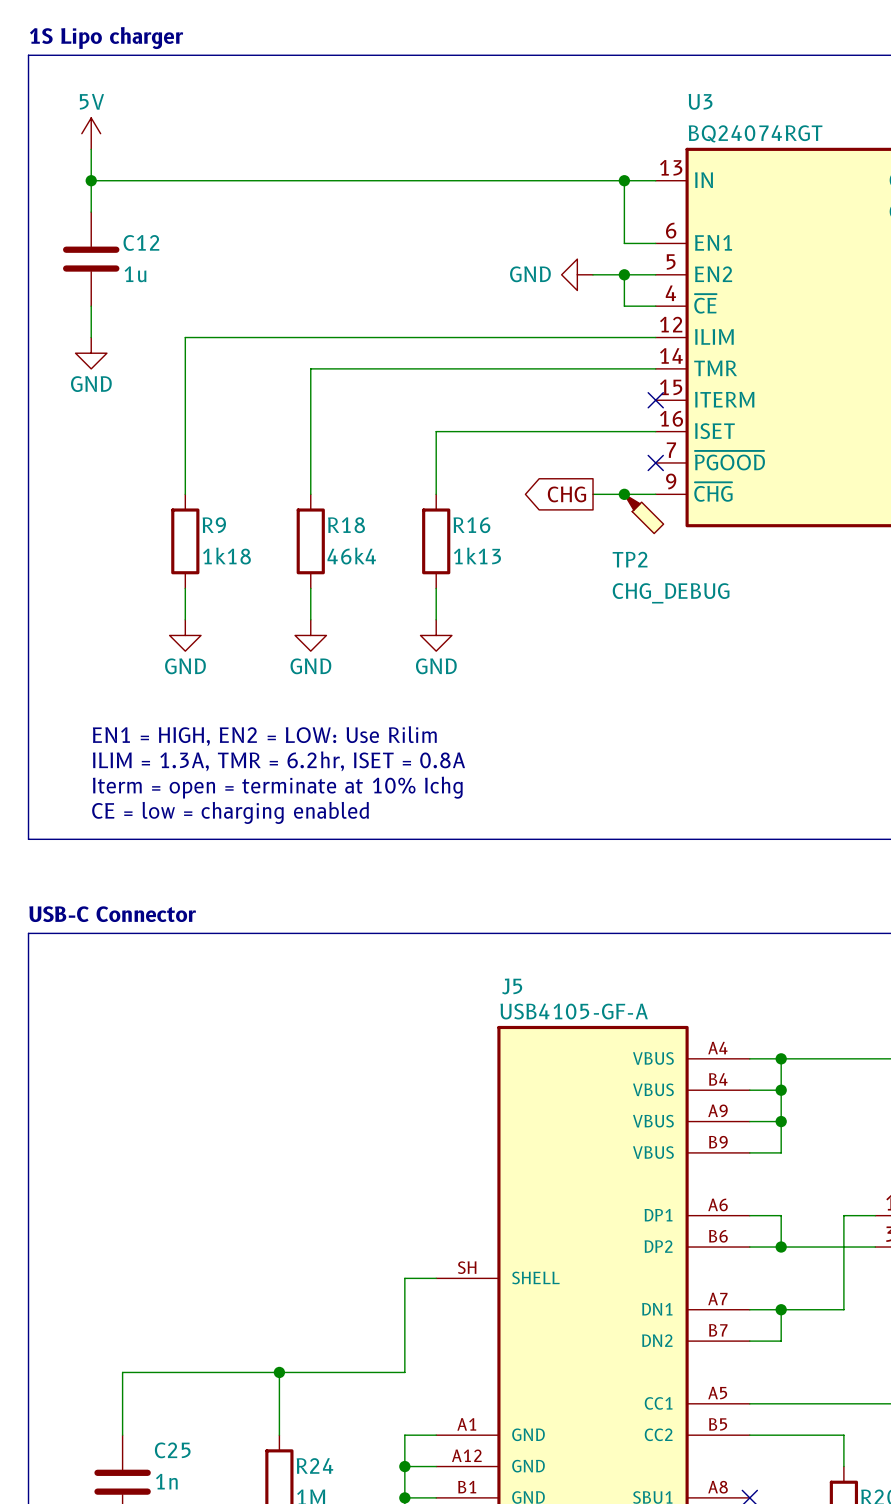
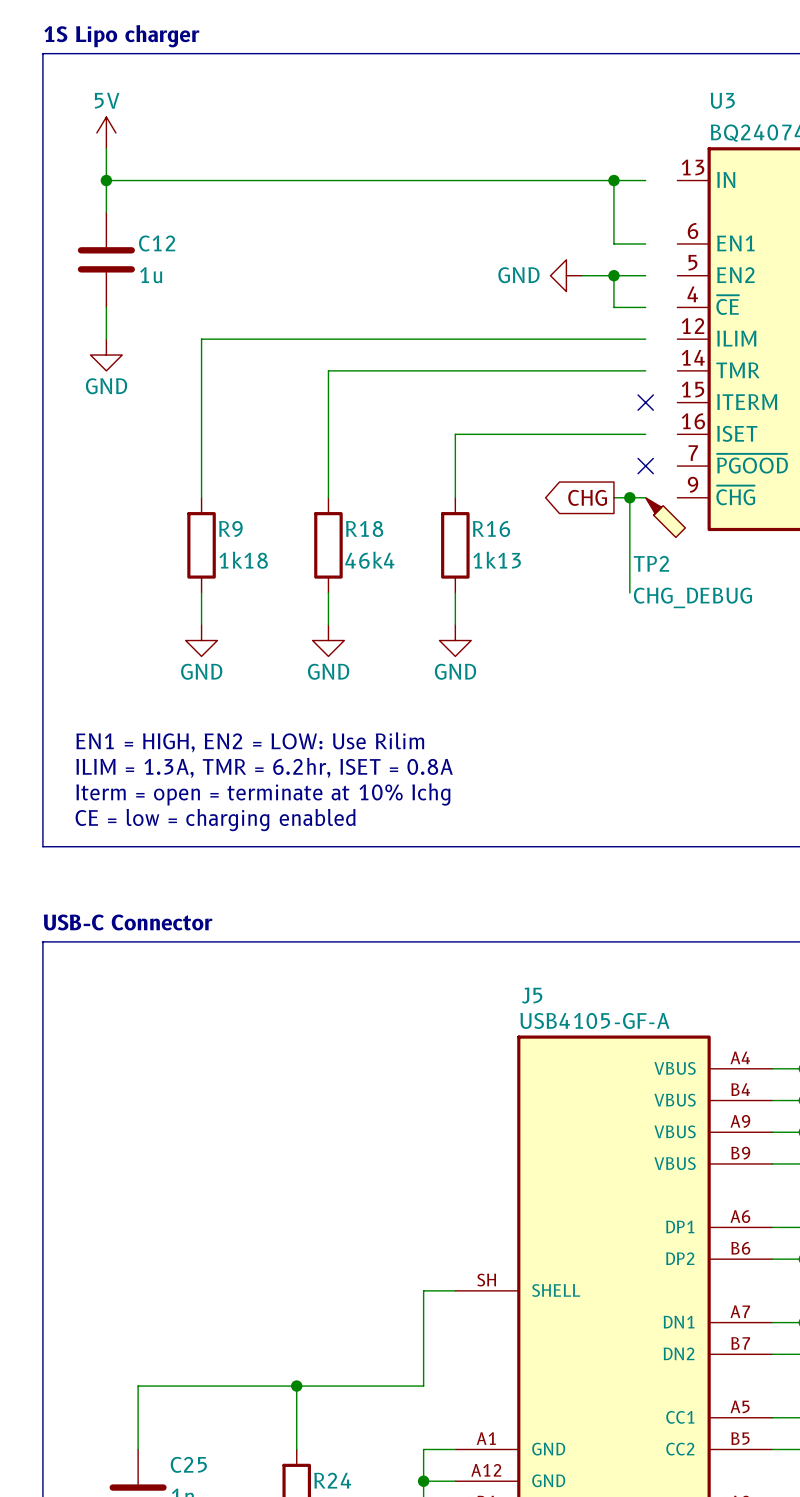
wire: none -> (613, 180) (613, 243) (645, 243)
junction position: (624, 180) -> (613, 180)
wire: (655, 180) (624, 180) (624, 243) (655, 243) -> none
wire: none -> (582, 275) (613, 275) (613, 307) (645, 307)
power symbol position: GND (577, 274) -> GND (566, 275)
junction position: (624, 274) -> (613, 275)
wire: (655, 274) (624, 274) (624, 306) (655, 306) -> none
wire: (624, 337) (655, 337) -> none
wire: (624, 368) (655, 368) -> none
no-connect mark position: (655, 400) -> (645, 402)
wire: (624, 431) (655, 431) -> none
no-connect mark position: (655, 462) -> (645, 466)
wire: none -> (629, 497) (629, 592)
wire: (624, 494) (655, 494) -> none
junction position: (624, 494) -> (629, 497)
text position: EN1 = HIGH, EN2 = LOW: Use Rilim (264, 736) -> EN1 = HIGH, EN2 = LOW: Use Rilim (250, 742)
text position: ILIM = 1.3A, TMR = 6.2hr, ISET = 0.8A (278, 761) -> ILIM = 1.3A, TMR = 6.2hr, ISET = 0.8A (264, 767)
text position: Iterm = open = terminate at 10% Ichg (277, 787) -> Iterm = open = terminate at 10% Ichg (263, 794)
text position: CE = low = charging enabled (230, 812) -> CE = low = charging enabled (215, 820)

